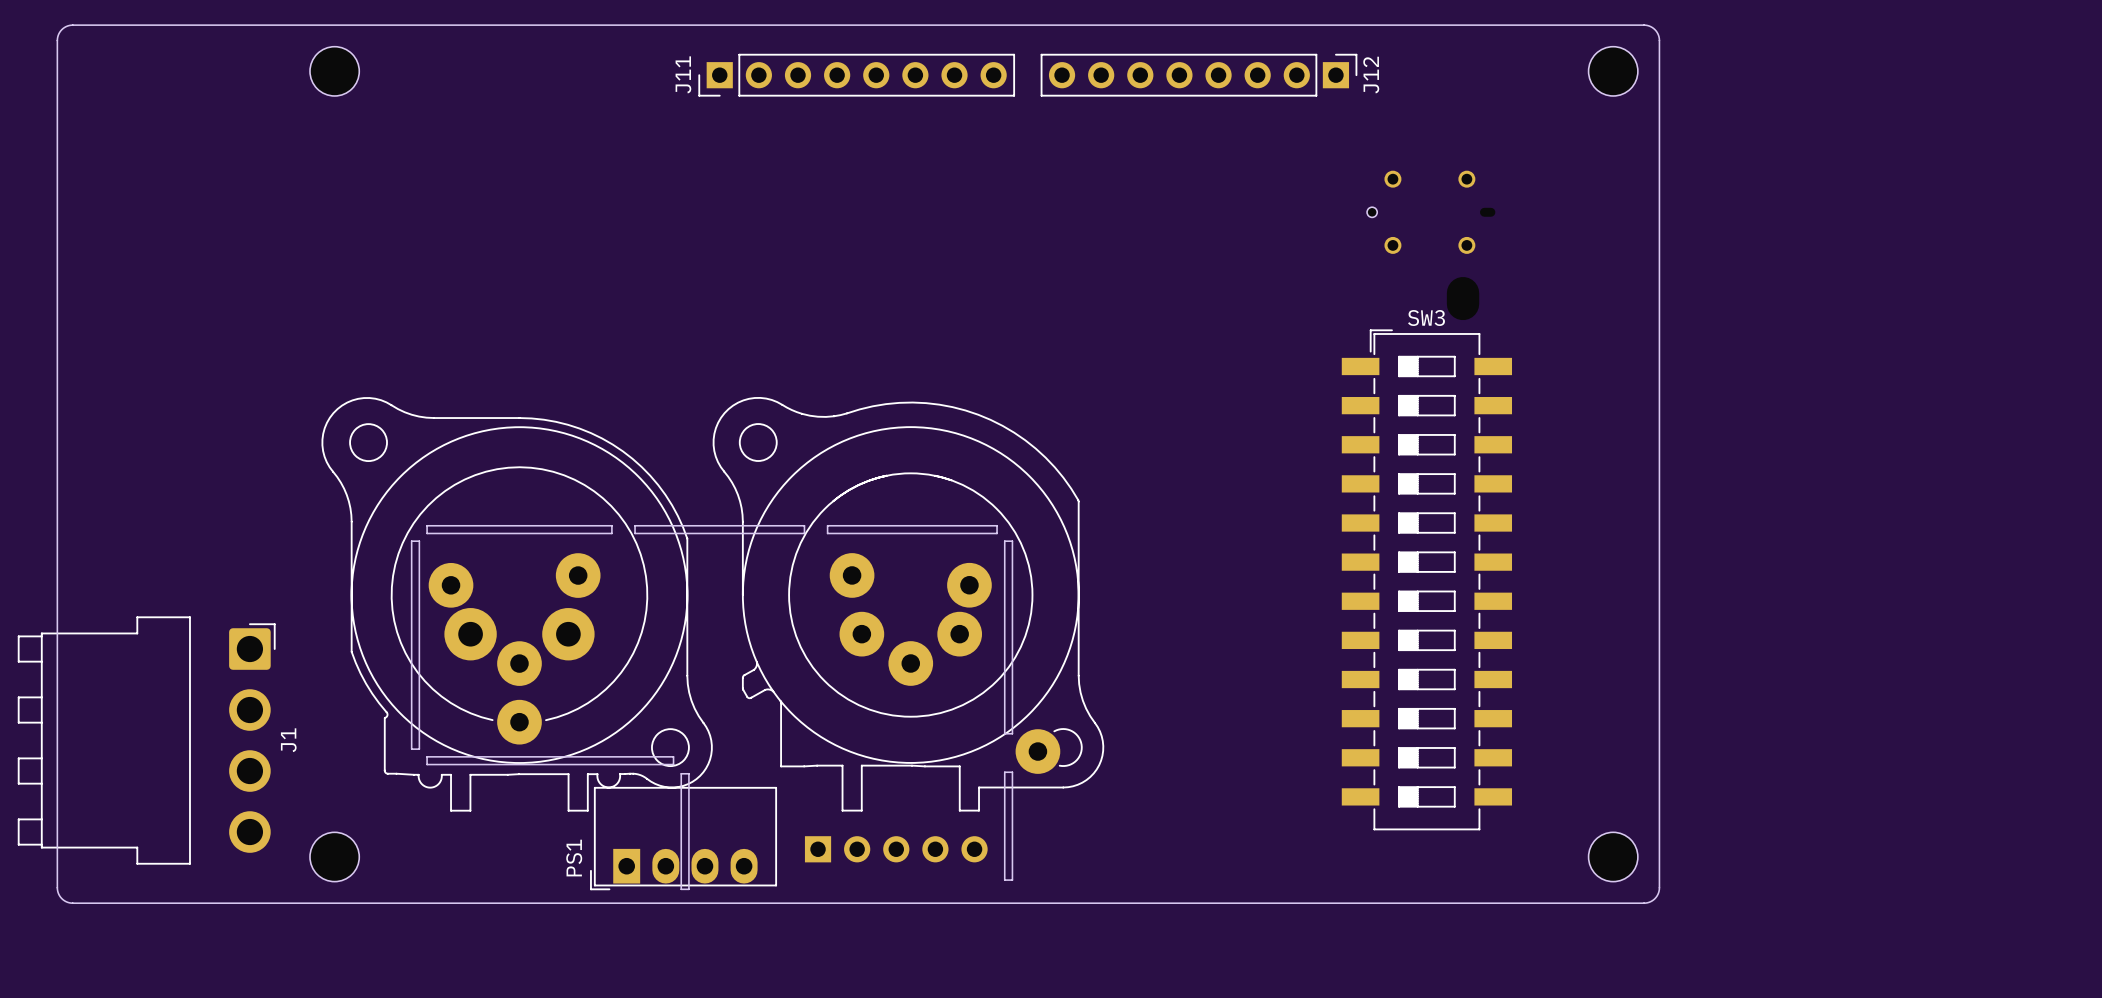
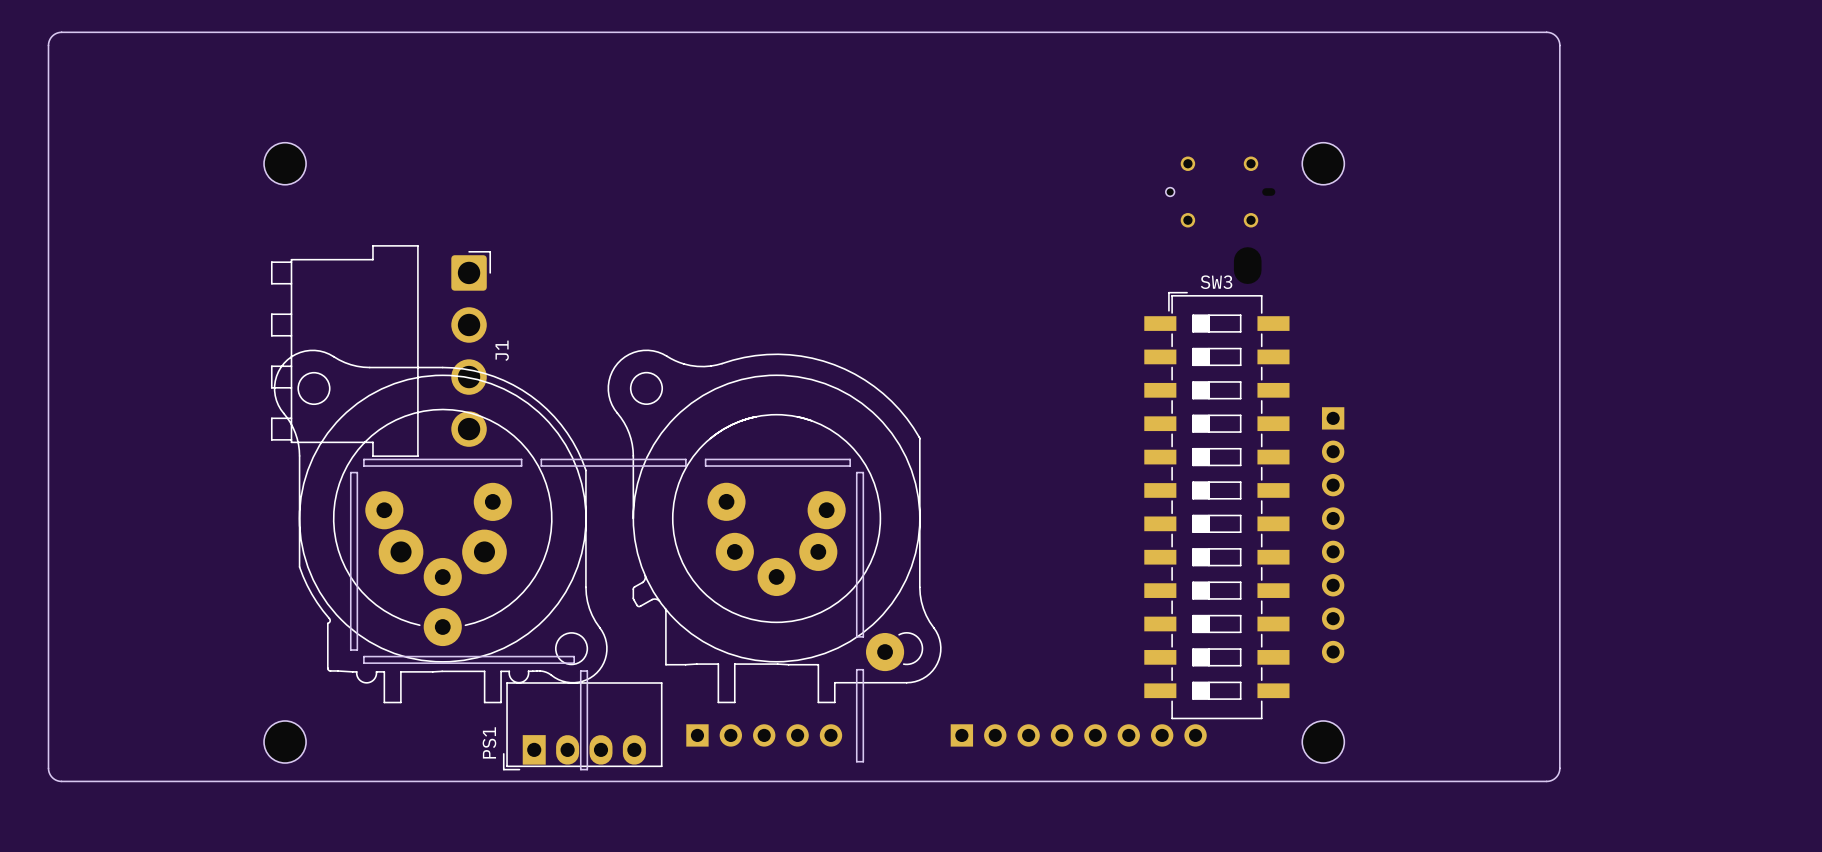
board edge: (1644, 25) (1654, 29) (1659, 40) (1659, 887) (1654, 898) (1644, 903) -> (1402, 32) (1548, 32) (1556, 36) (1559, 45) (1559, 771) (1554, 778) (1548, 781) (1402, 781)
part position: (334, 71) -> (285, 163)
part position: (1613, 71) -> (1323, 163)
J11: (856, 75) -> none
J12: (1198, 75) -> none
part: none -> (1333, 535)
J1 position: (146, 740) -> (380, 351)
part: none -> (1078, 735)
part position: (1613, 856) -> (1323, 742)

